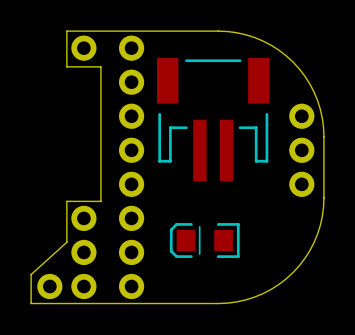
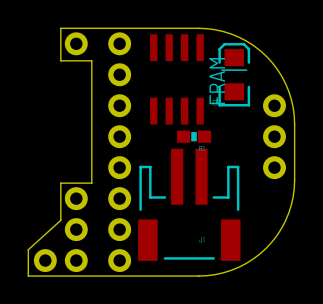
part: none -> (234, 74)
FRAM: none -> (176, 79)
part: (213, 119) -> none
part: none -> (193, 136)
part: none -> (189, 204)
part: (204, 240) -> none

